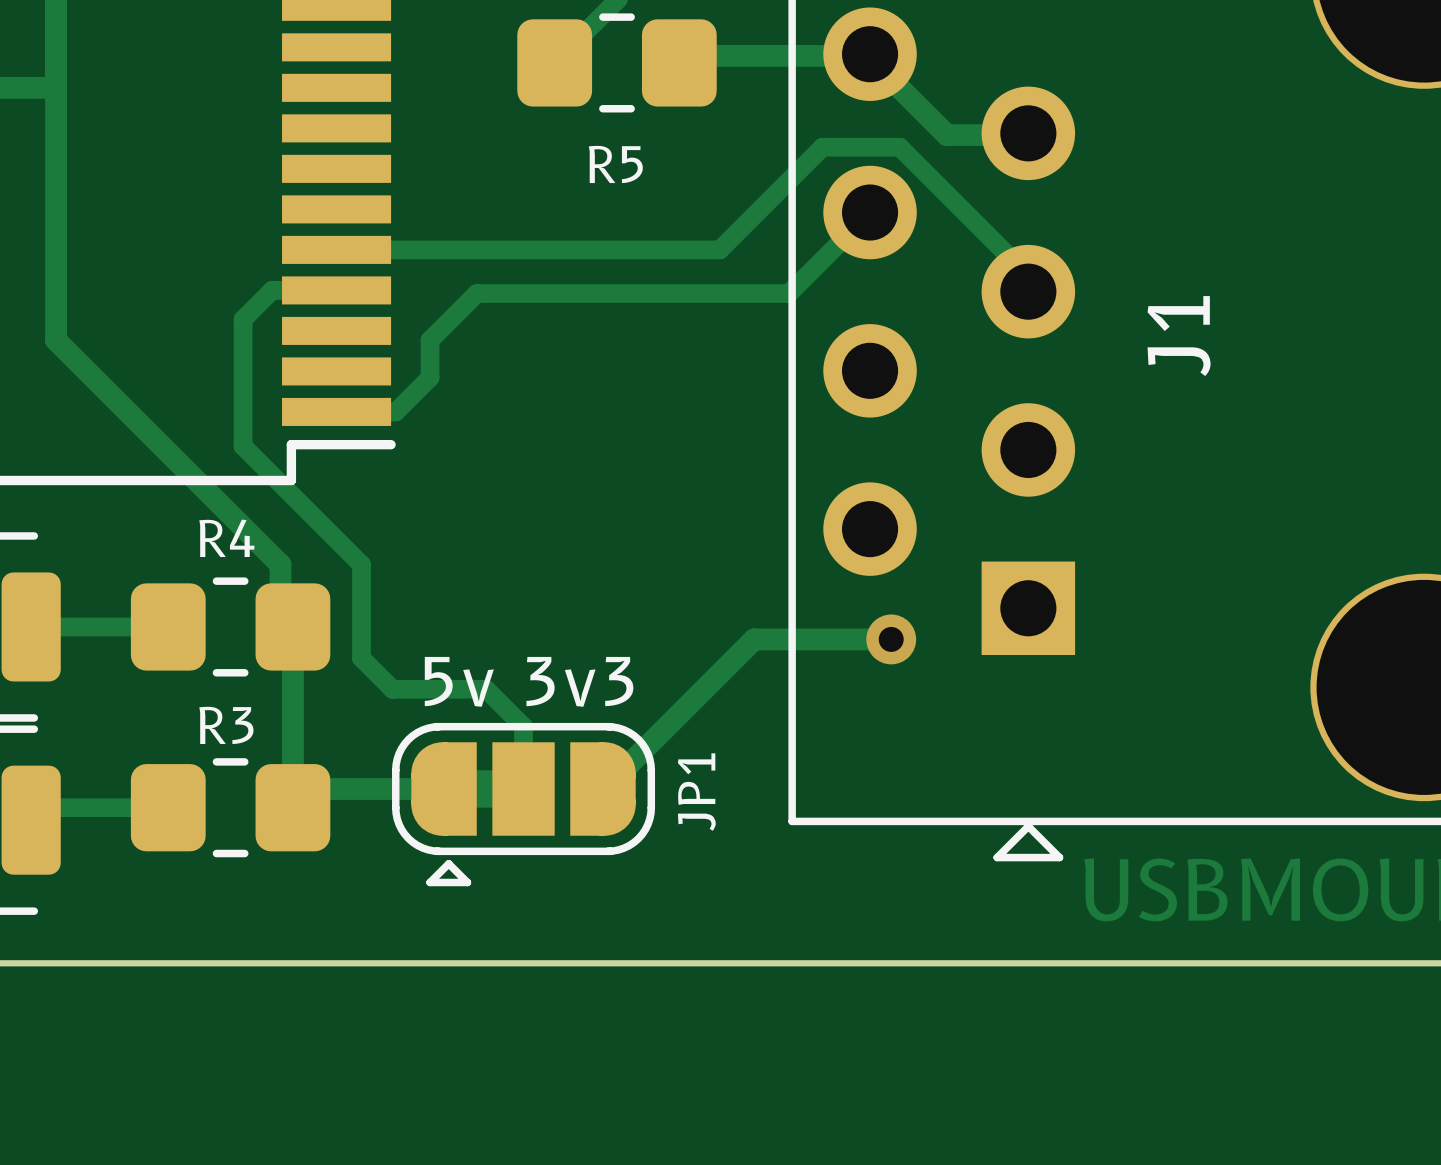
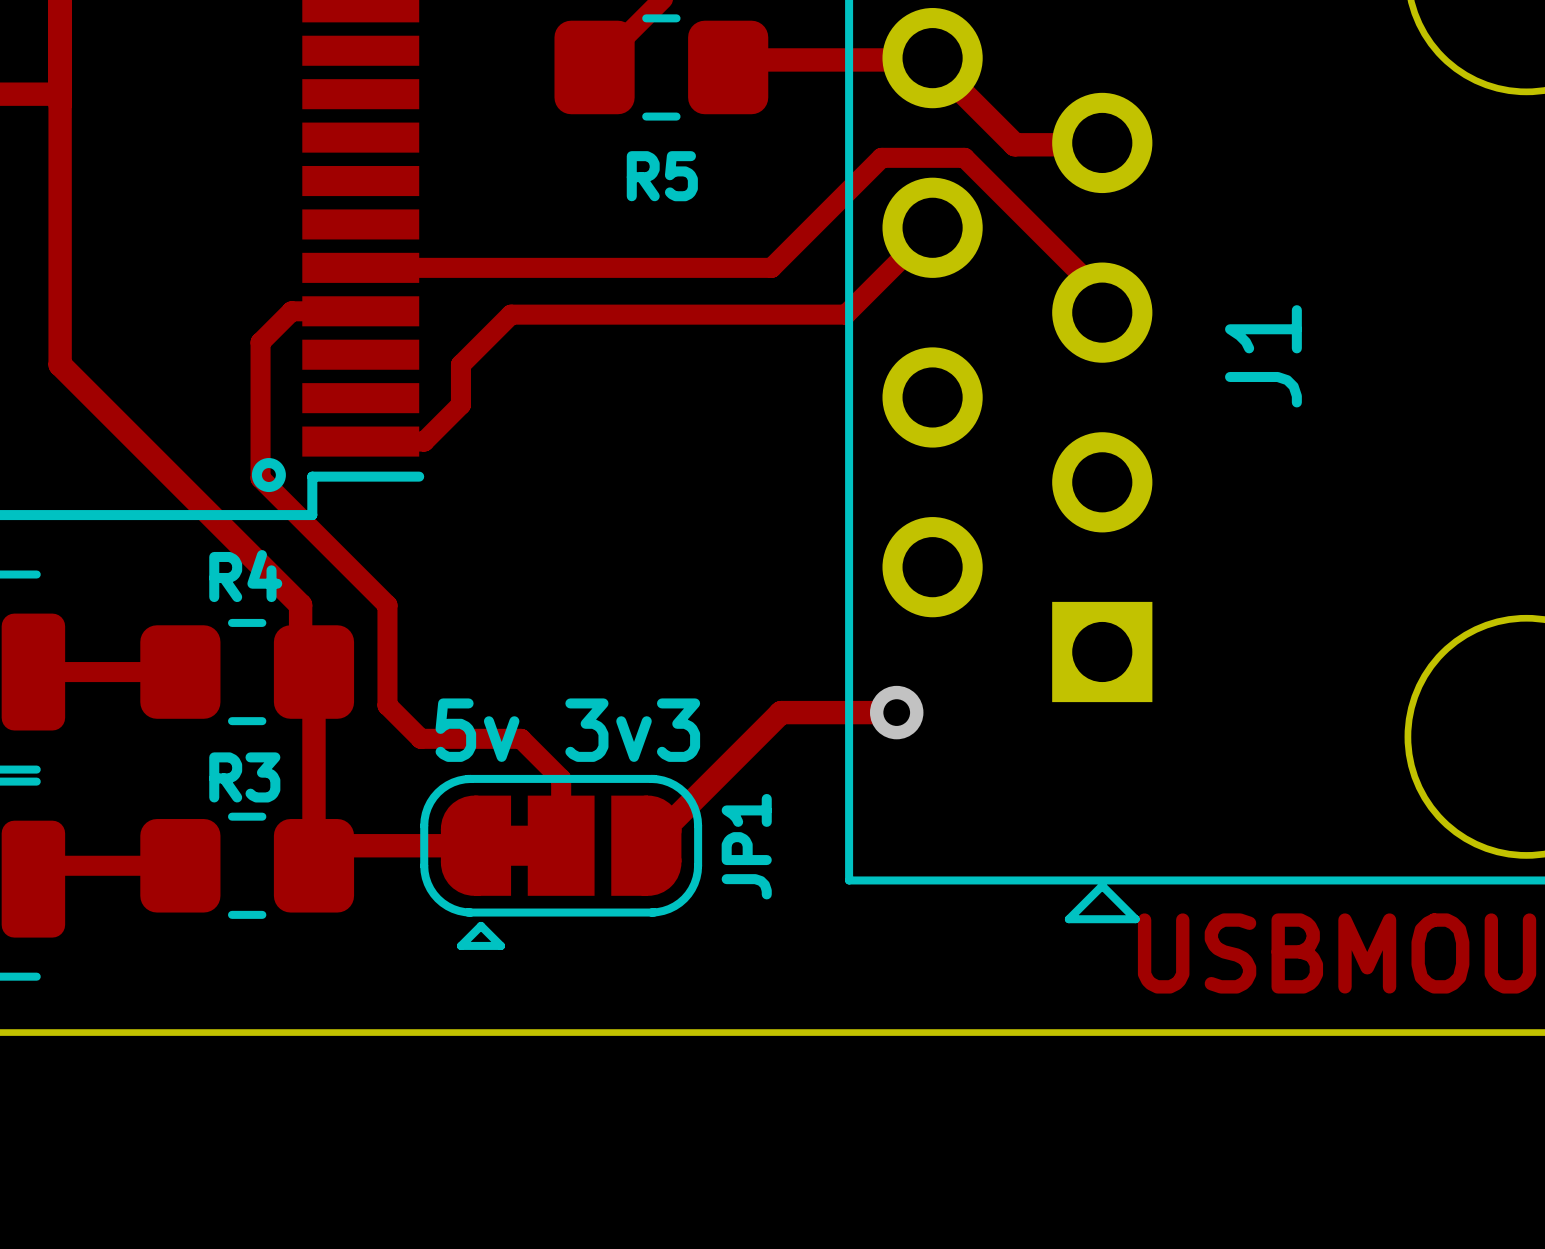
drawing: none -> [251, 458, 286, 493]
track: (891, 639) (754, 639) (728, 664) -> (896, 712) (781, 712)
via position: (891, 639) -> (896, 712)

